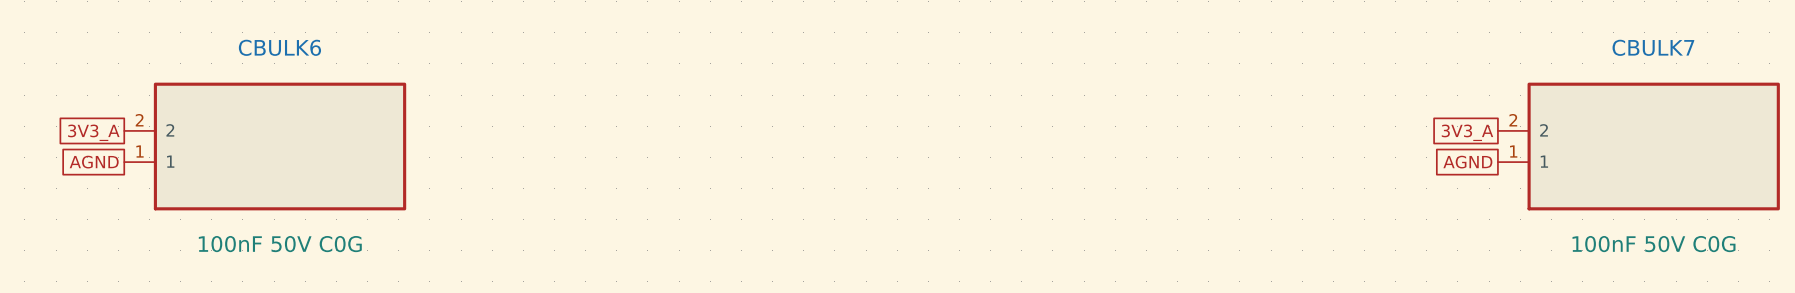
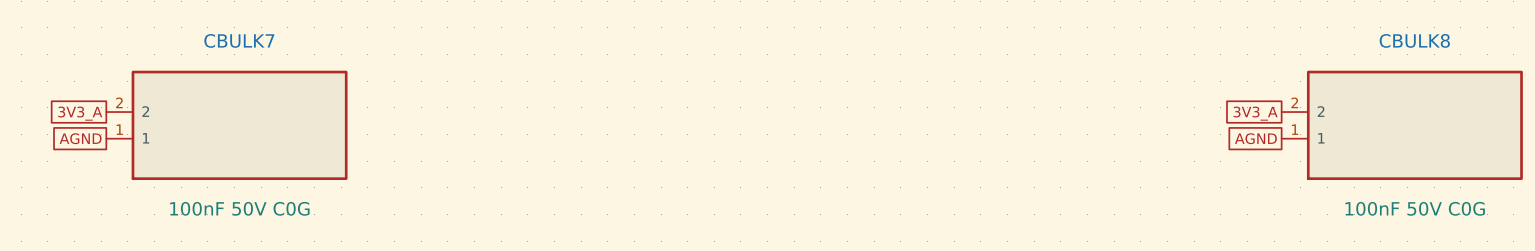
CBULK6 name: CBULK6 (279, 47) -> CBULK7 (239, 40)
CBULK7 name: CBULK7 (1653, 47) -> CBULK8 (1414, 40)

